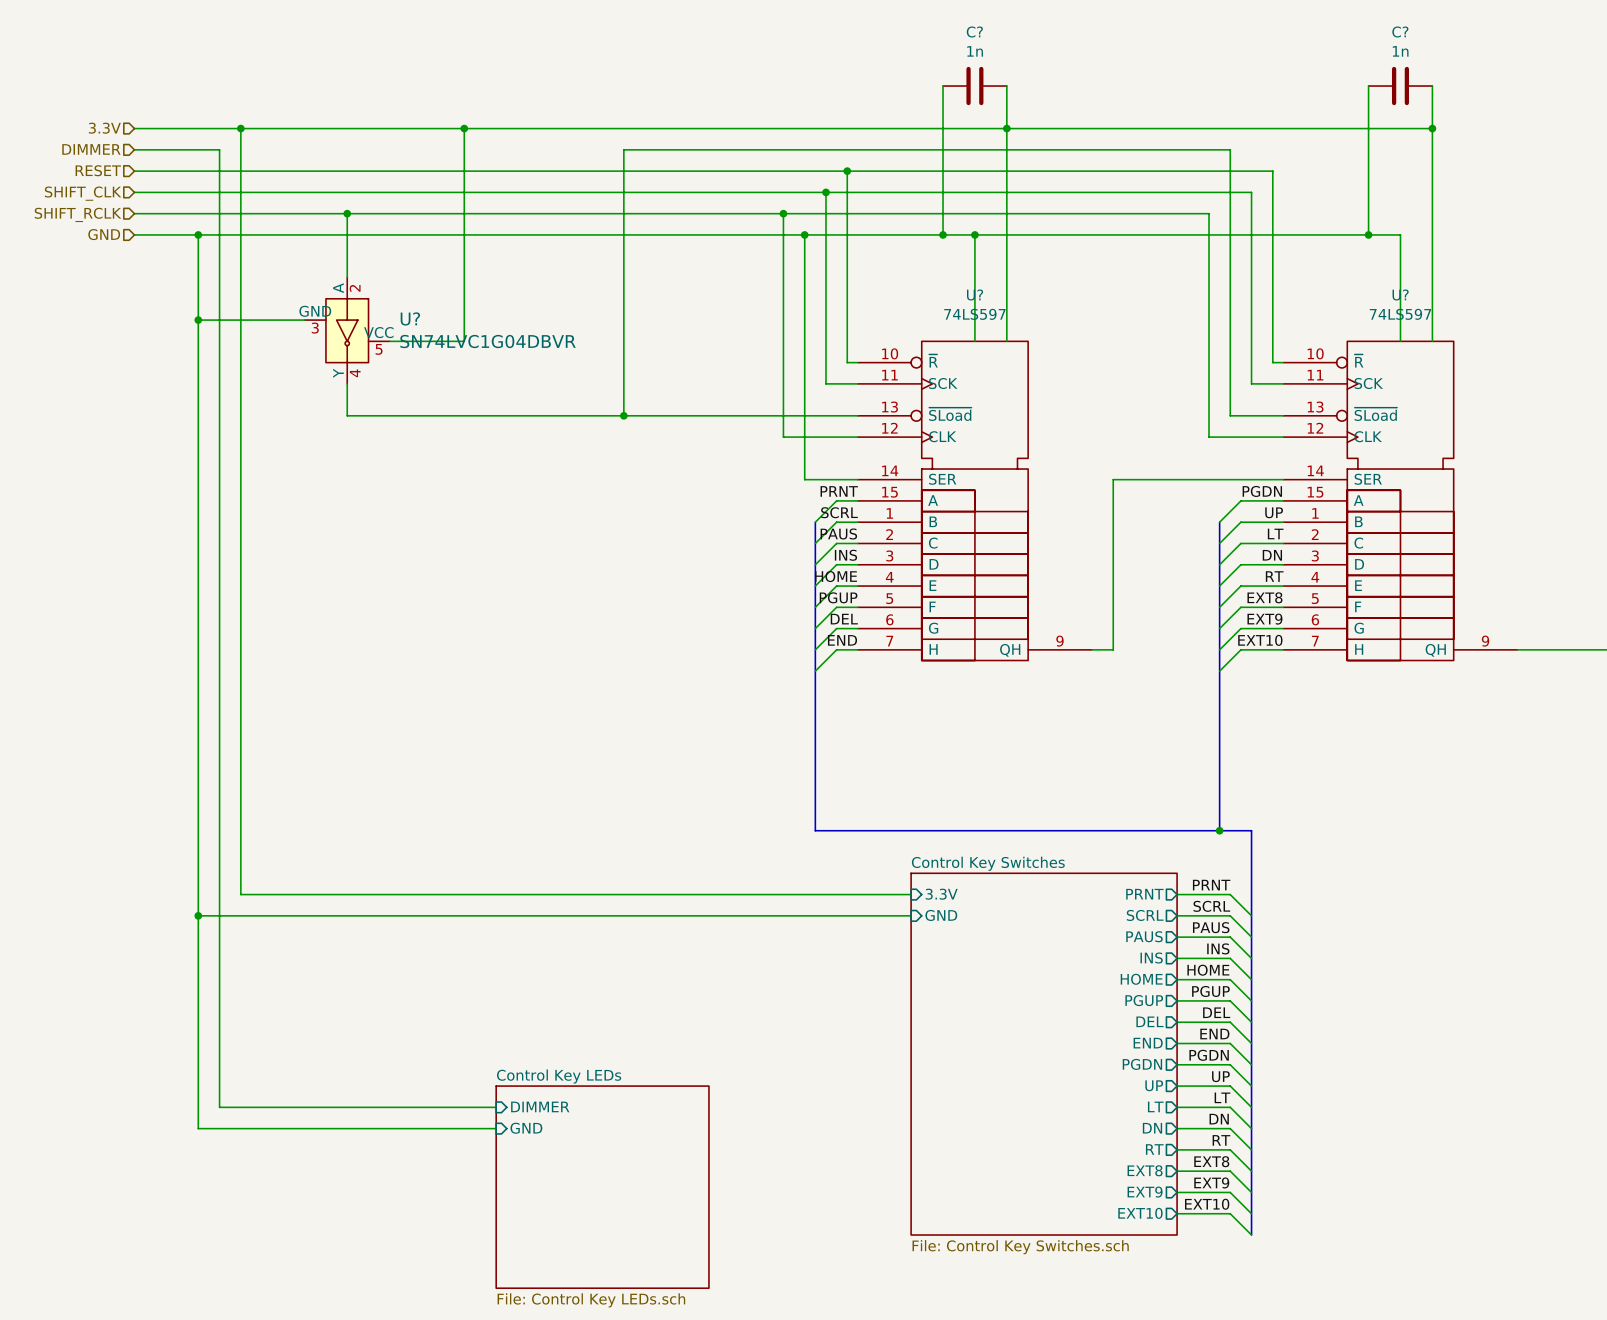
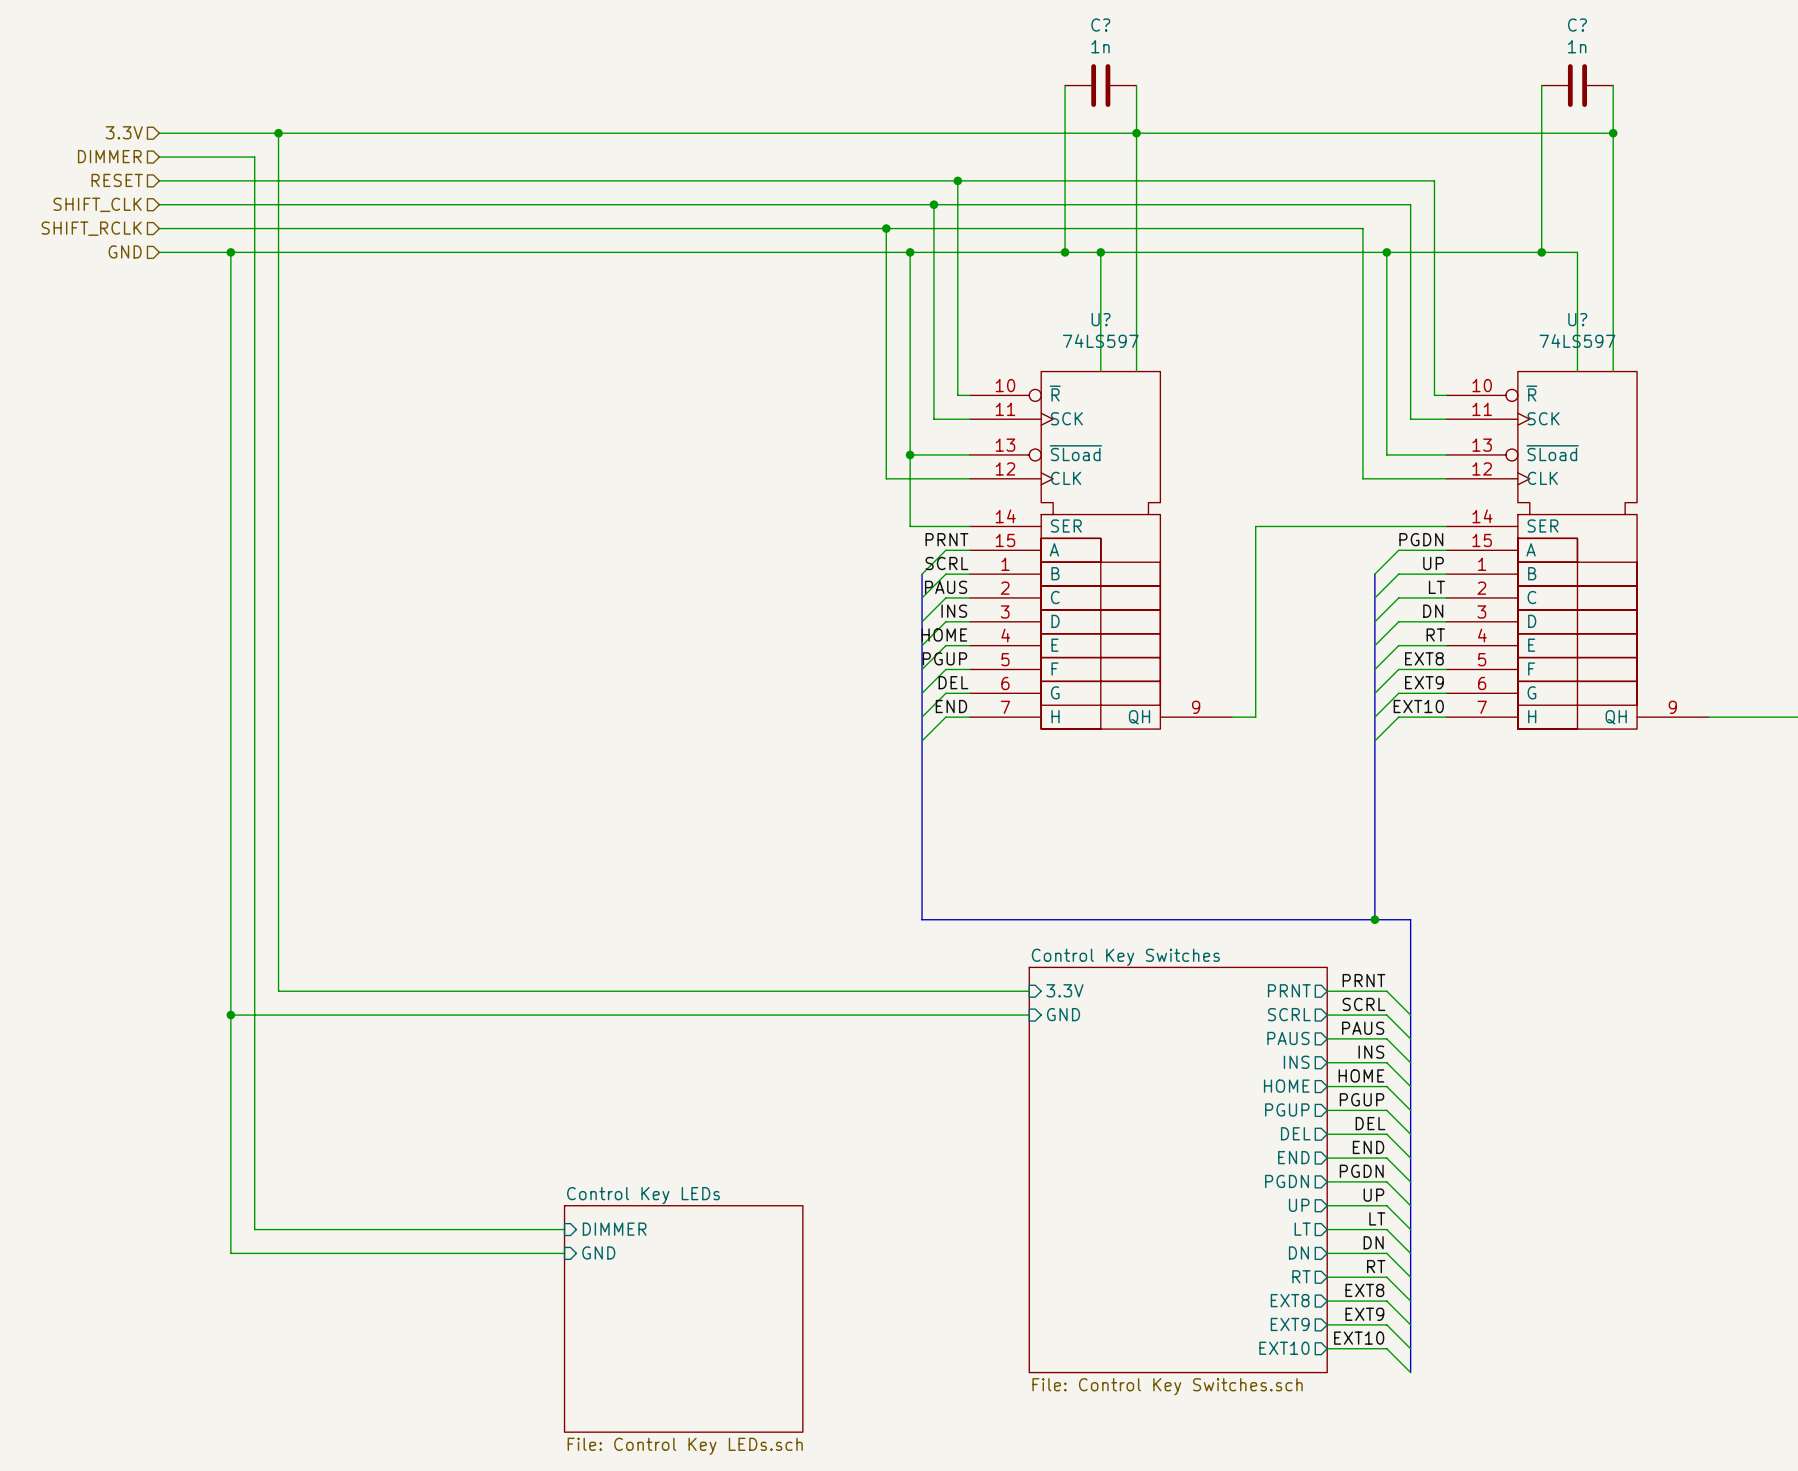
wire: (464, 128) (464, 341) (389, 341) -> none
junction: (464, 128) -> none
wire: (347, 213) (347, 277) -> none
junction: (347, 213) -> none
wire: (1230, 234) (1230, 149) (623, 149) (623, 415) -> none
junction: none -> (1386, 252)
wire: (198, 320) (304, 320) -> none
junction: (198, 320) -> none
U?: SN74LVC1G04DBVR (347, 330) -> none
wire: (347, 383) (347, 415) (804, 415) -> none
junction: (623, 415) -> none
junction: none -> (910, 454)

